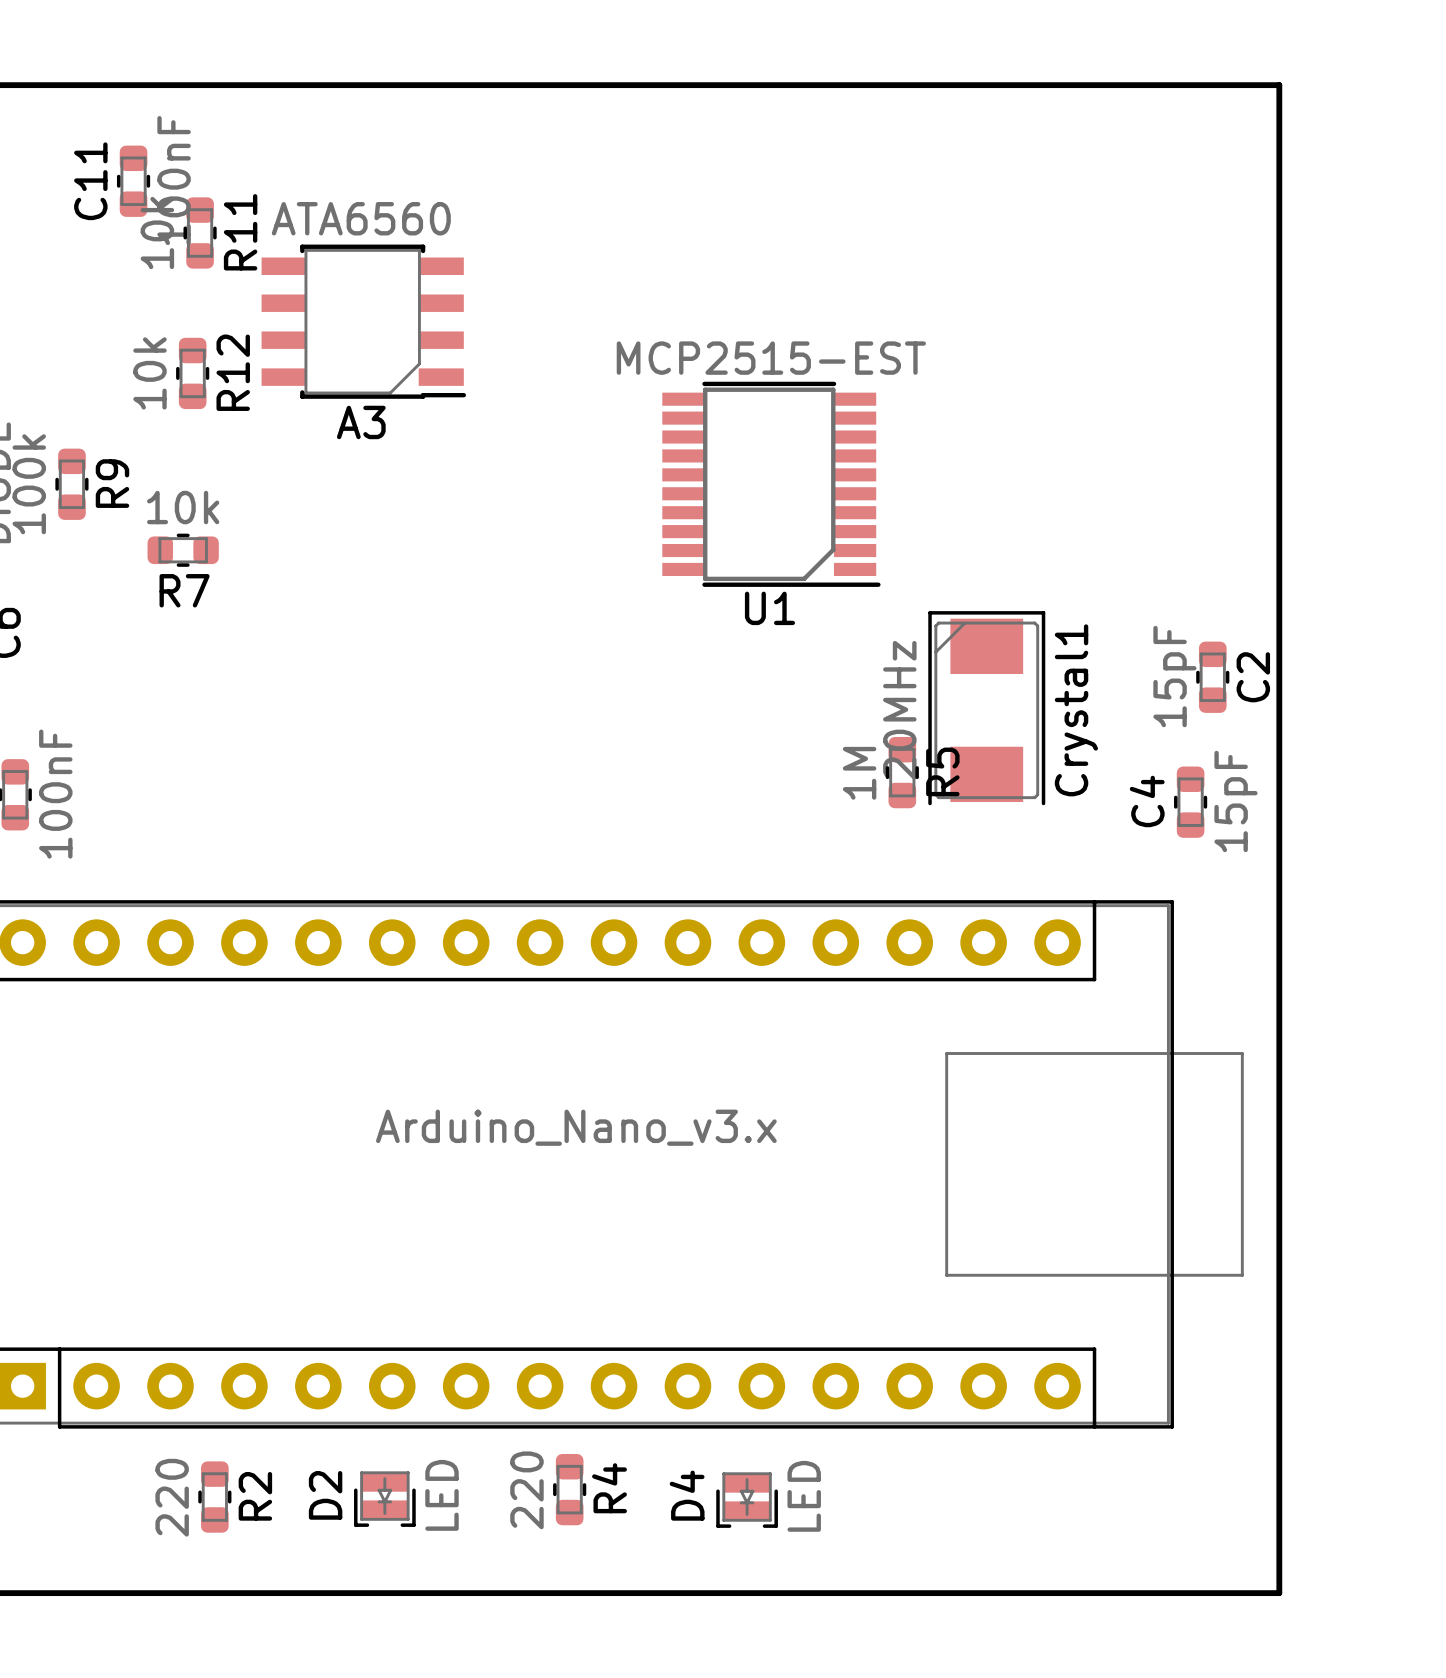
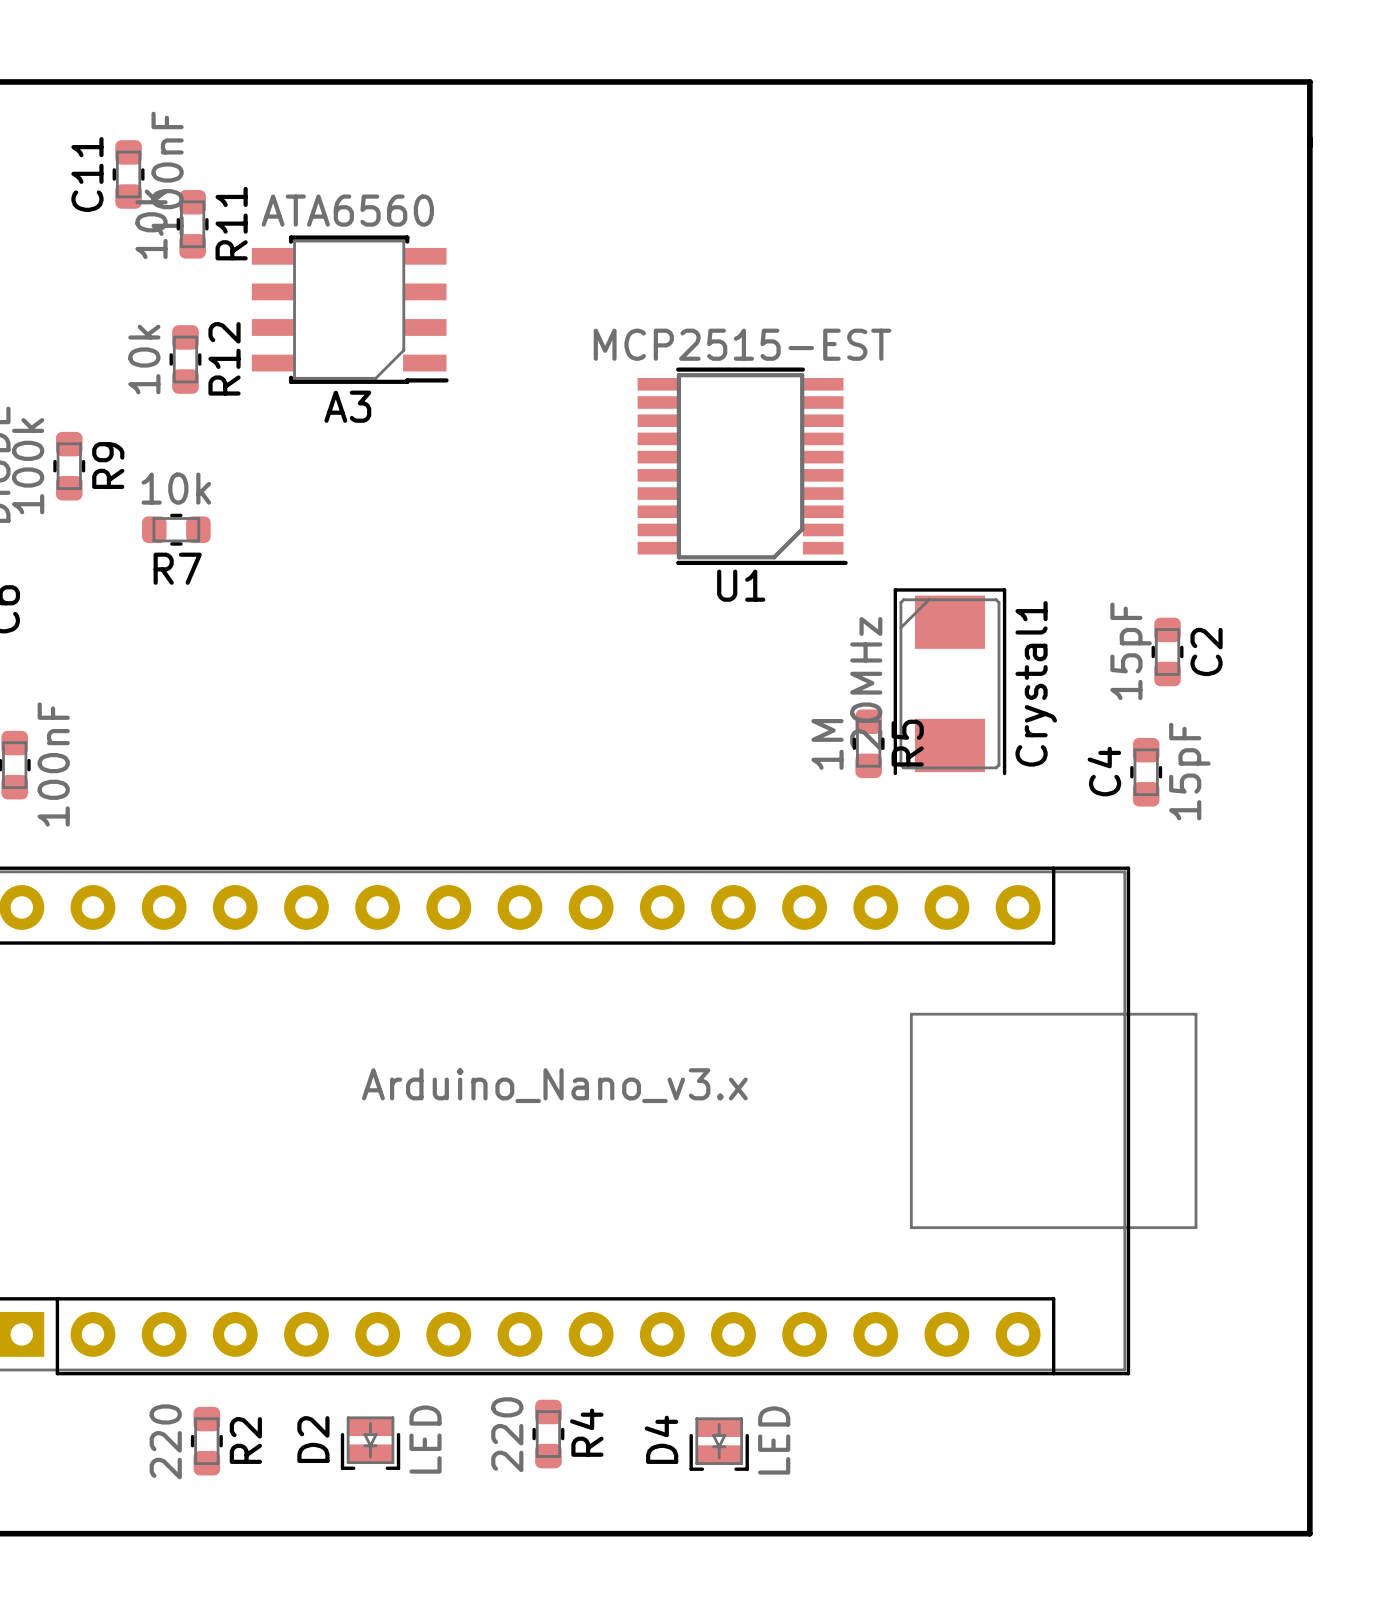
line: (1279, 85) (1279, 1593) -> (1231, 81) (1309, 81) (1309, 1533) (1231, 1533)

